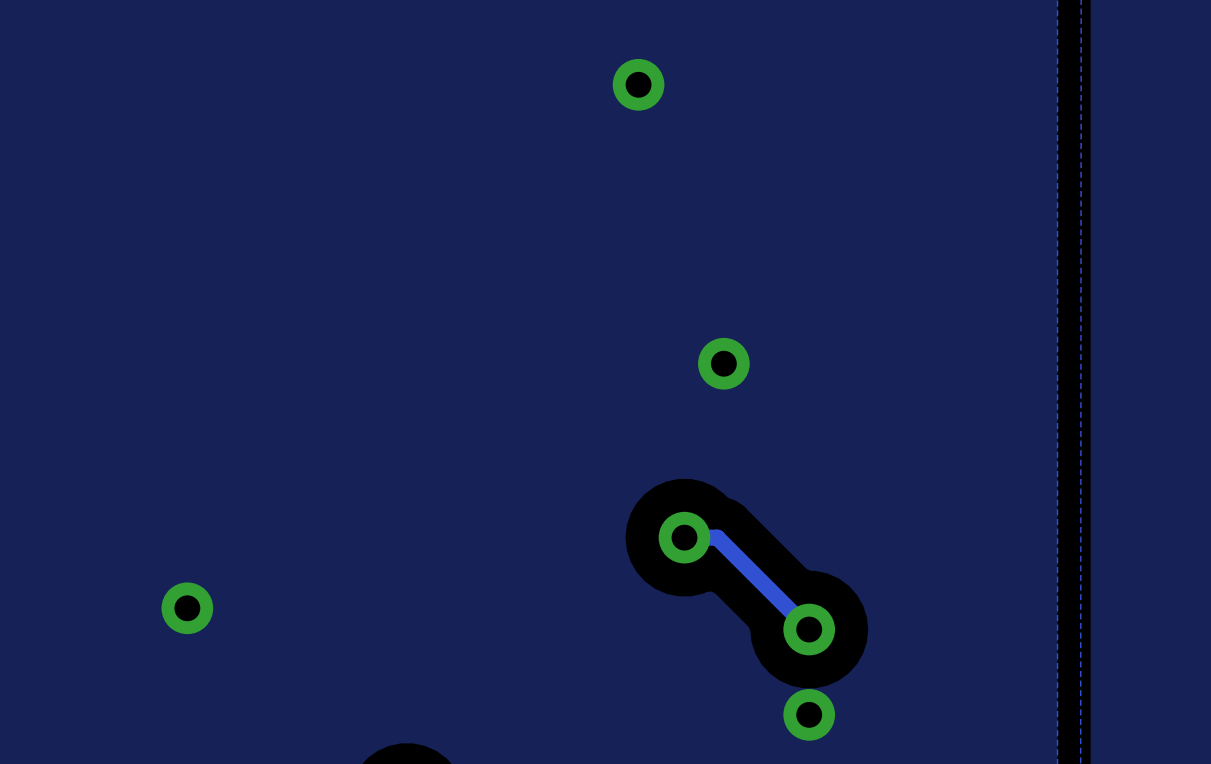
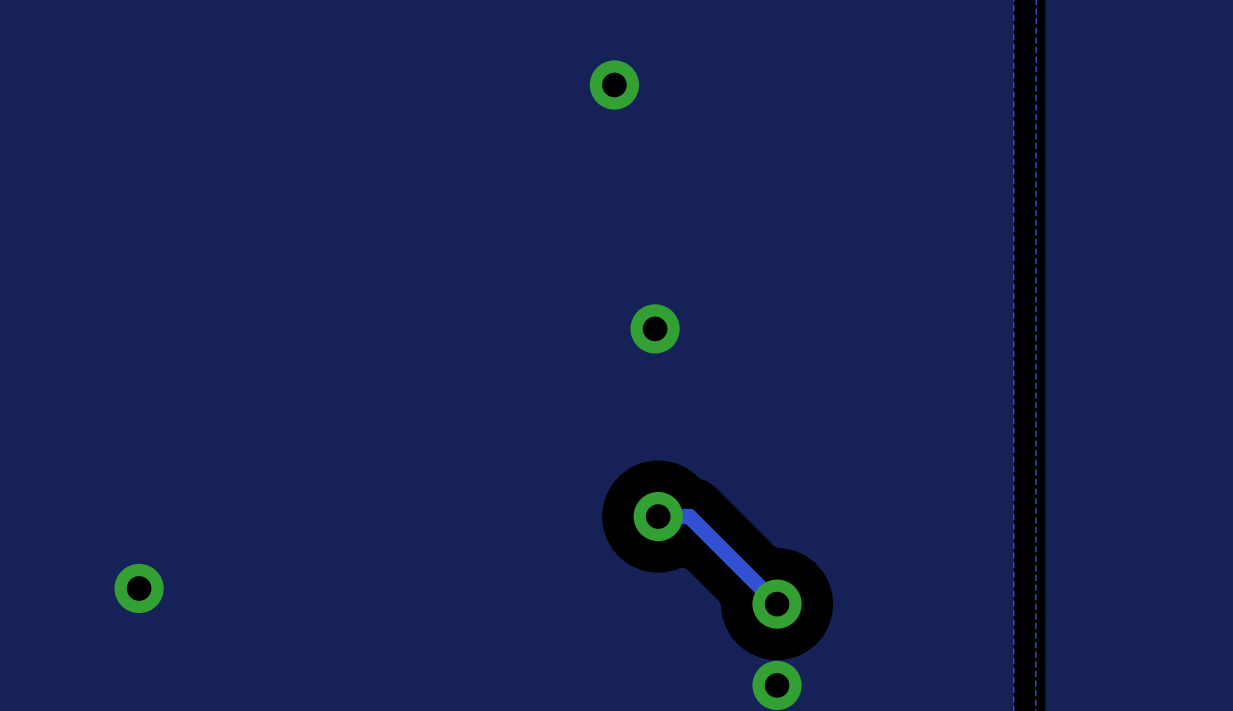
via position: (723, 363) -> (655, 328)
via position: (187, 608) -> (139, 588)

